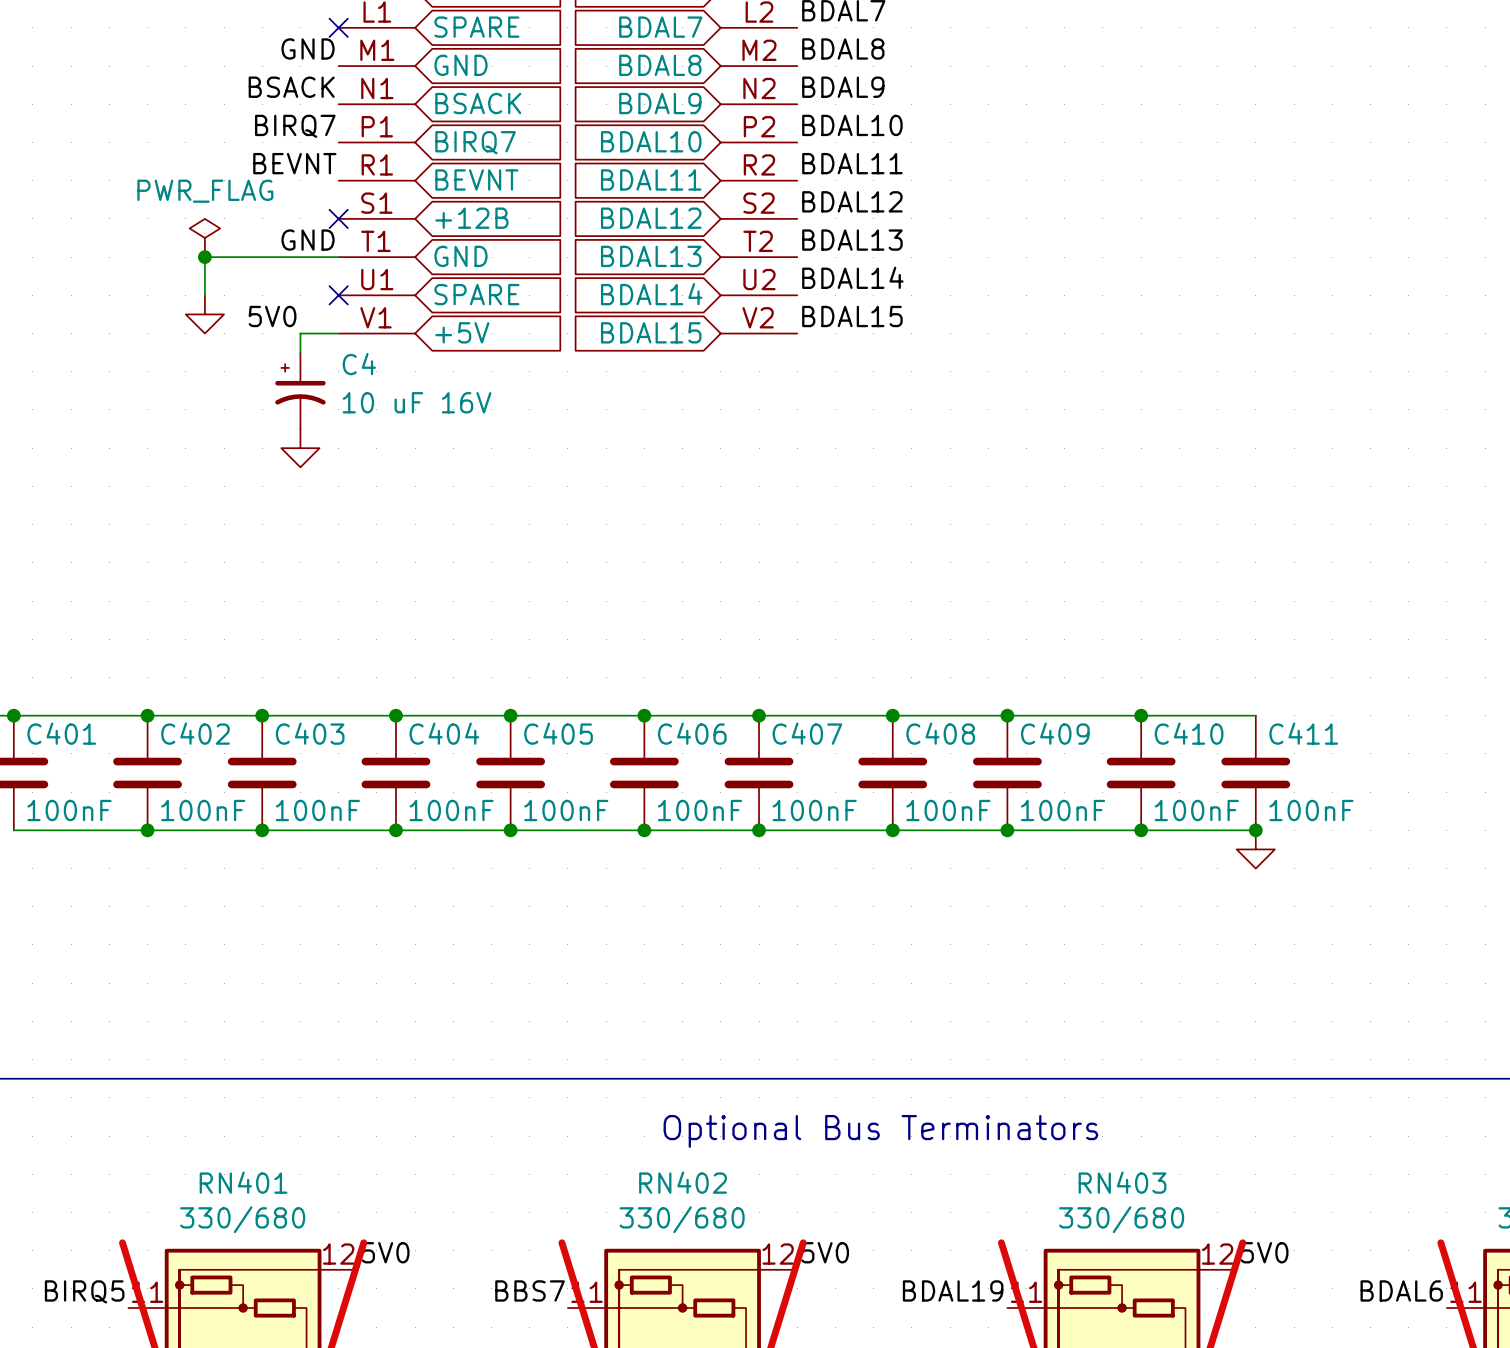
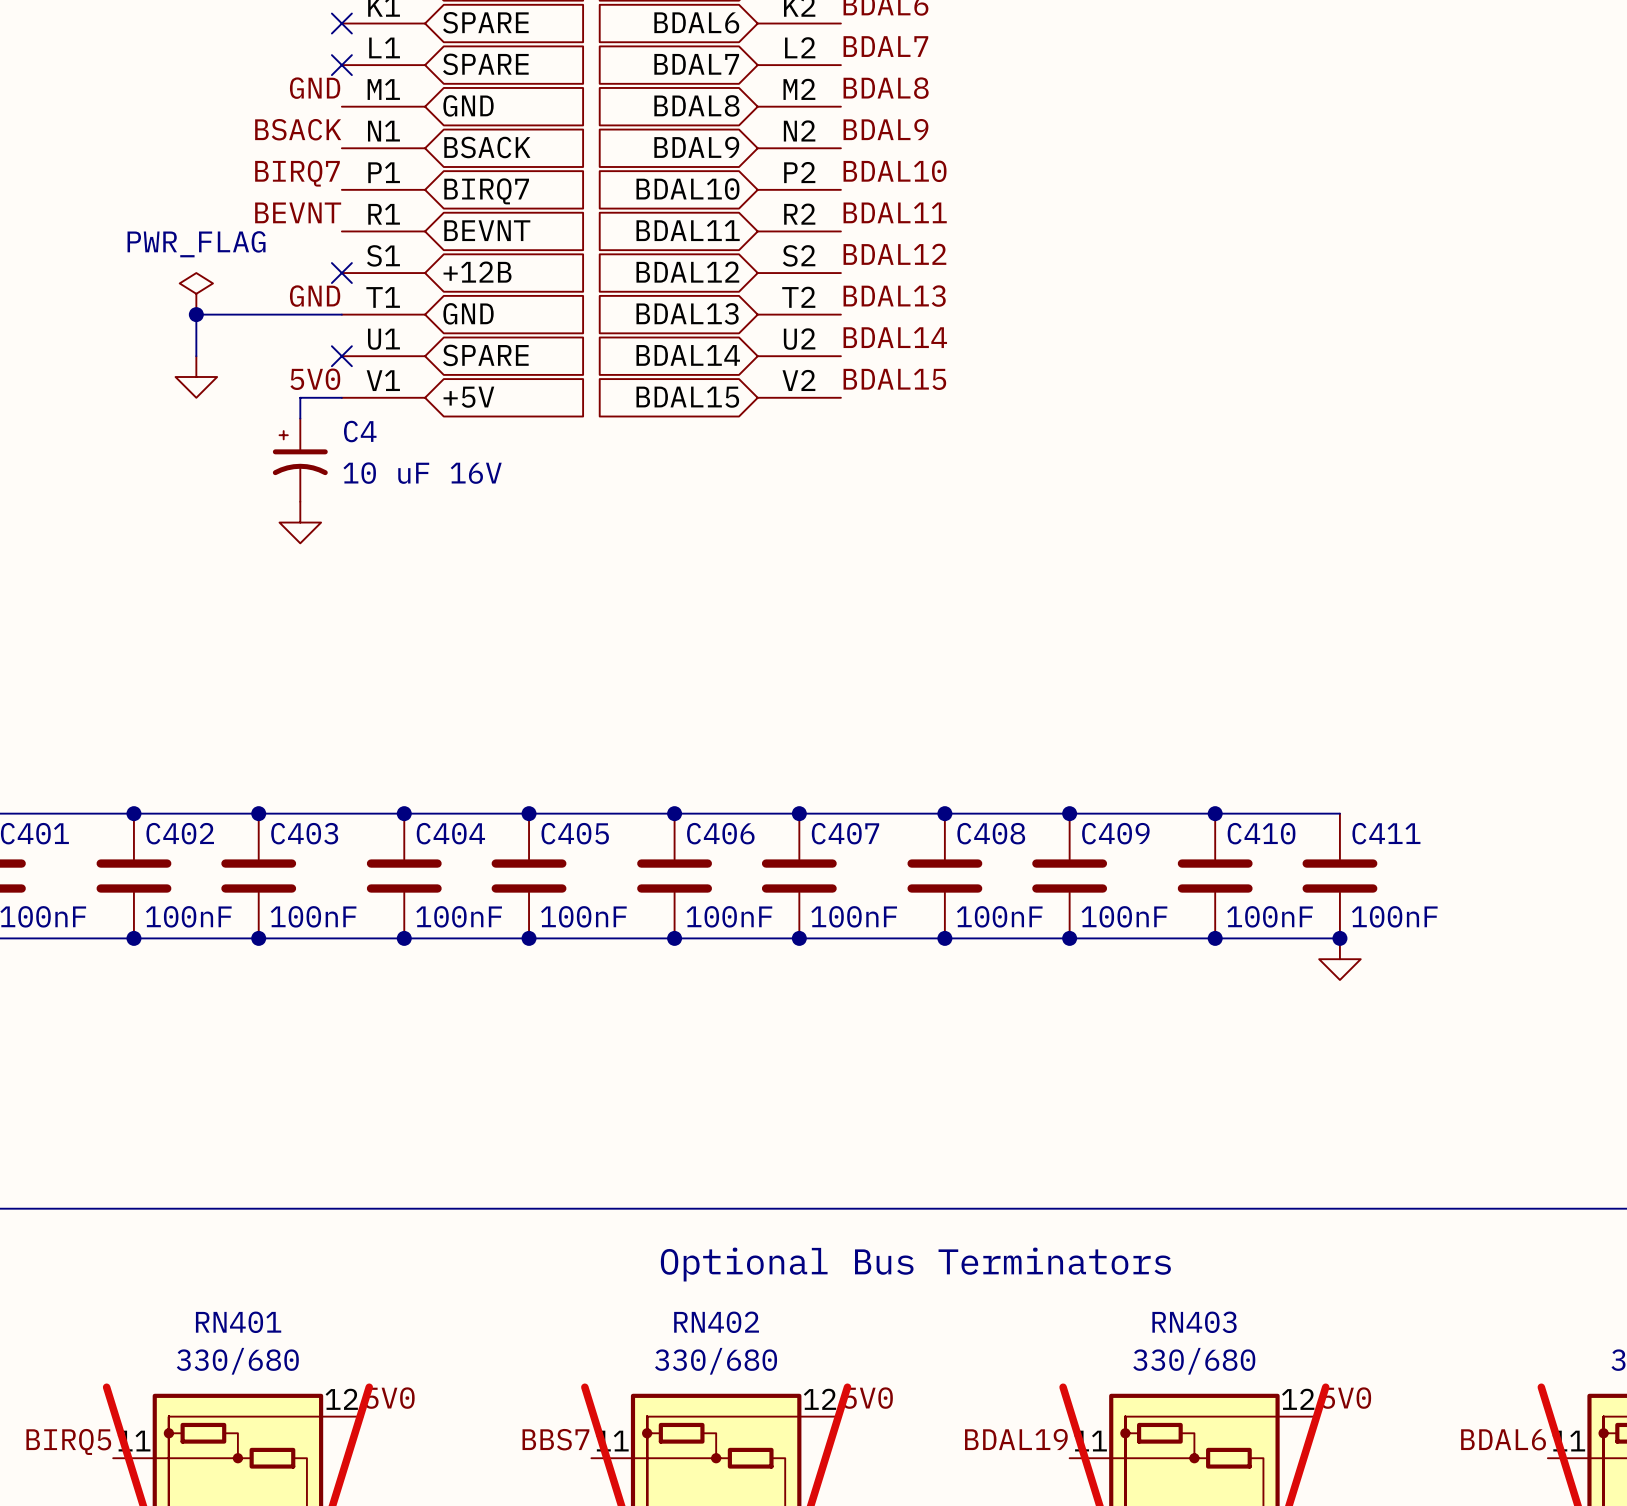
label position: 5V0 (272, 316) -> 5V0 (315, 379)

